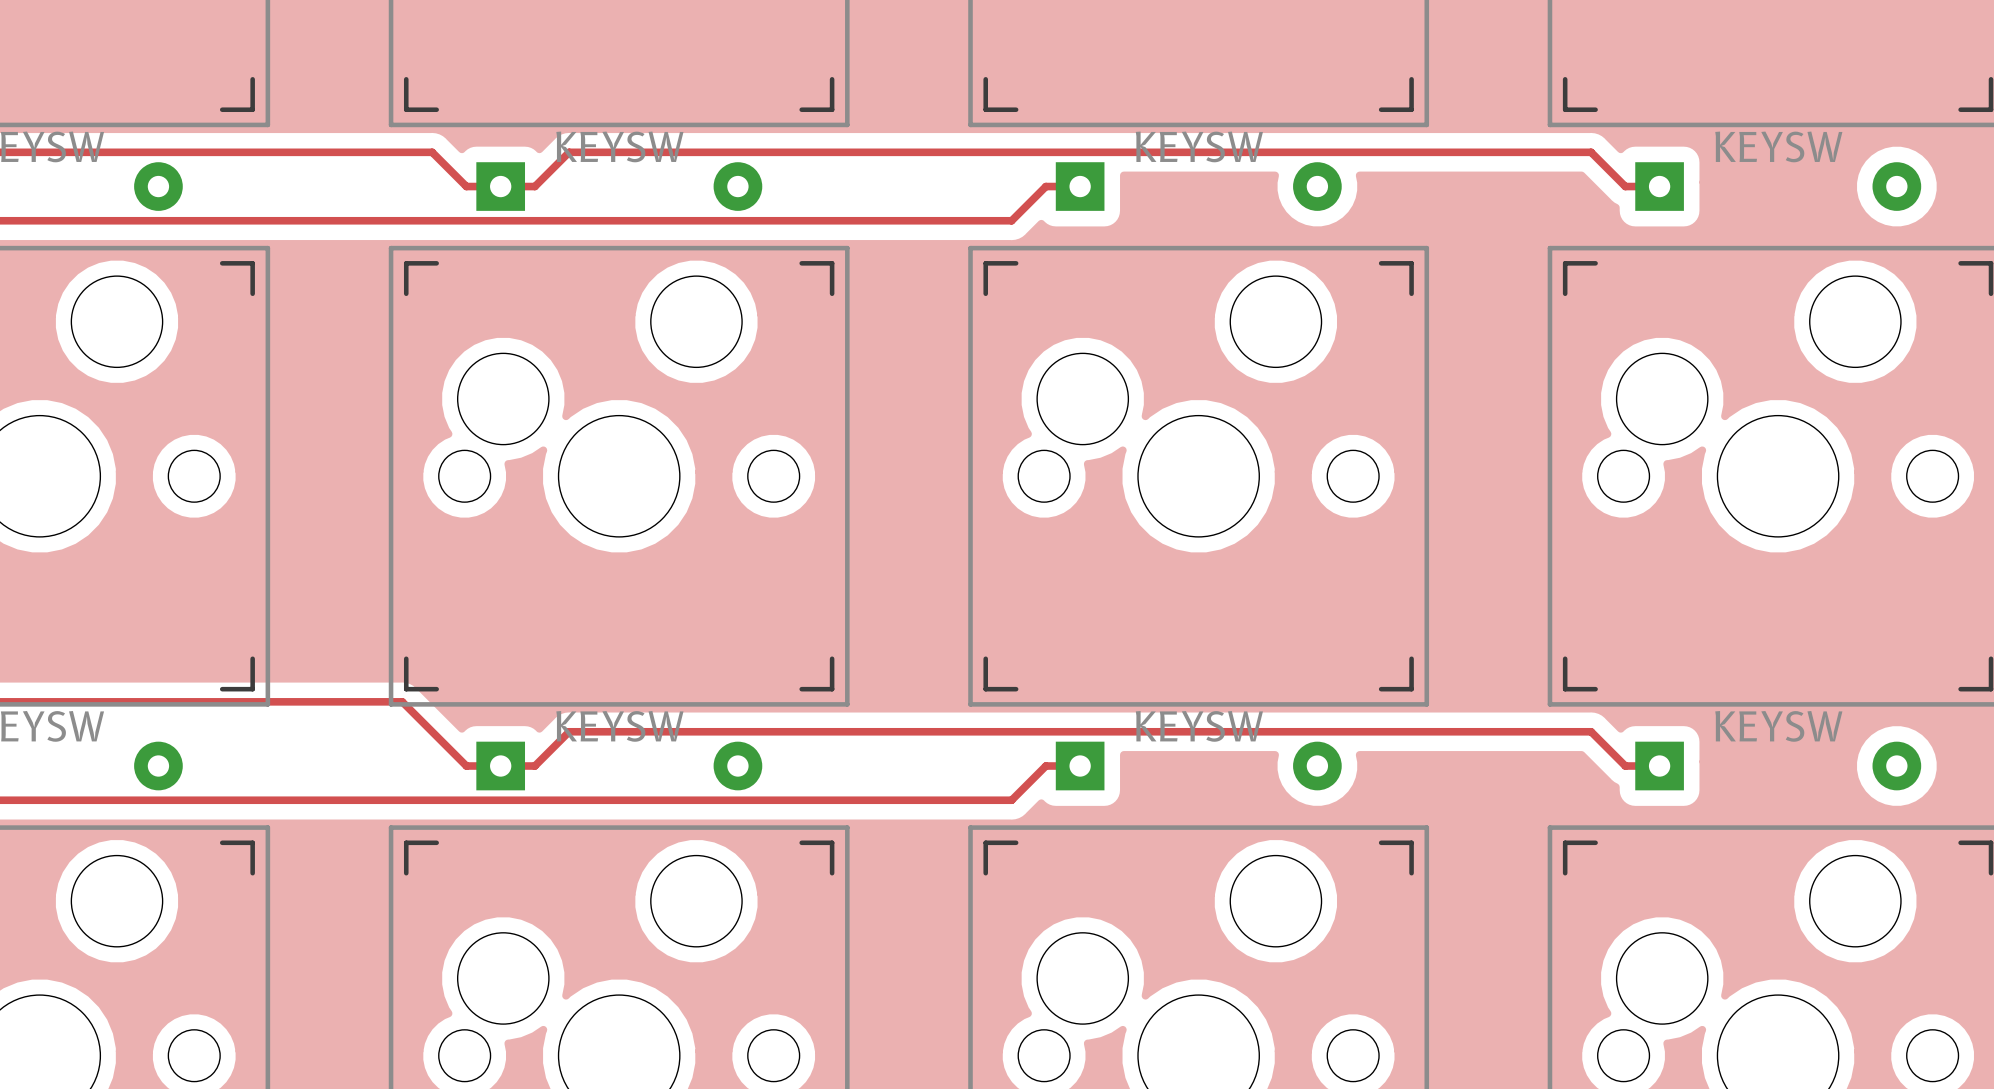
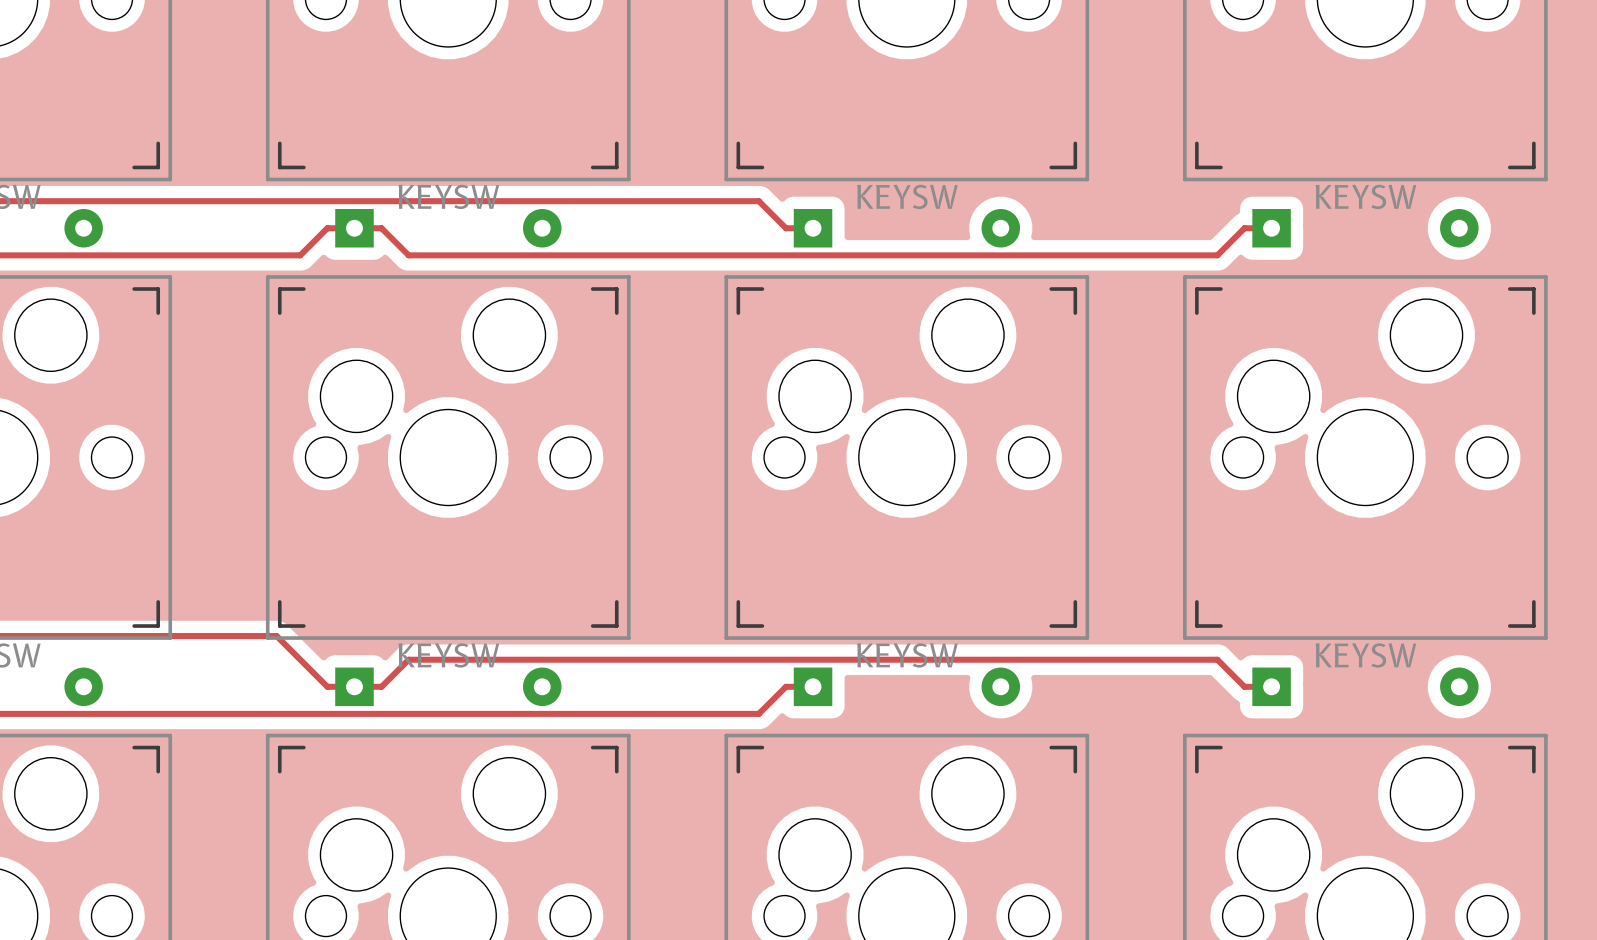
track: (432, 152) (466, 186) -> (300, 255) (327, 228)
track: (569, 152) (534, 186) -> (408, 255) (381, 228)
track: (1011, 152) (1591, 152) (1625, 186) -> (758, 255) (1217, 255) (1244, 228)
track: (1045, 186) (1011, 220) -> (785, 228) (758, 201)
track: (432, 220) (569, 220) -> (300, 201) (408, 201)

